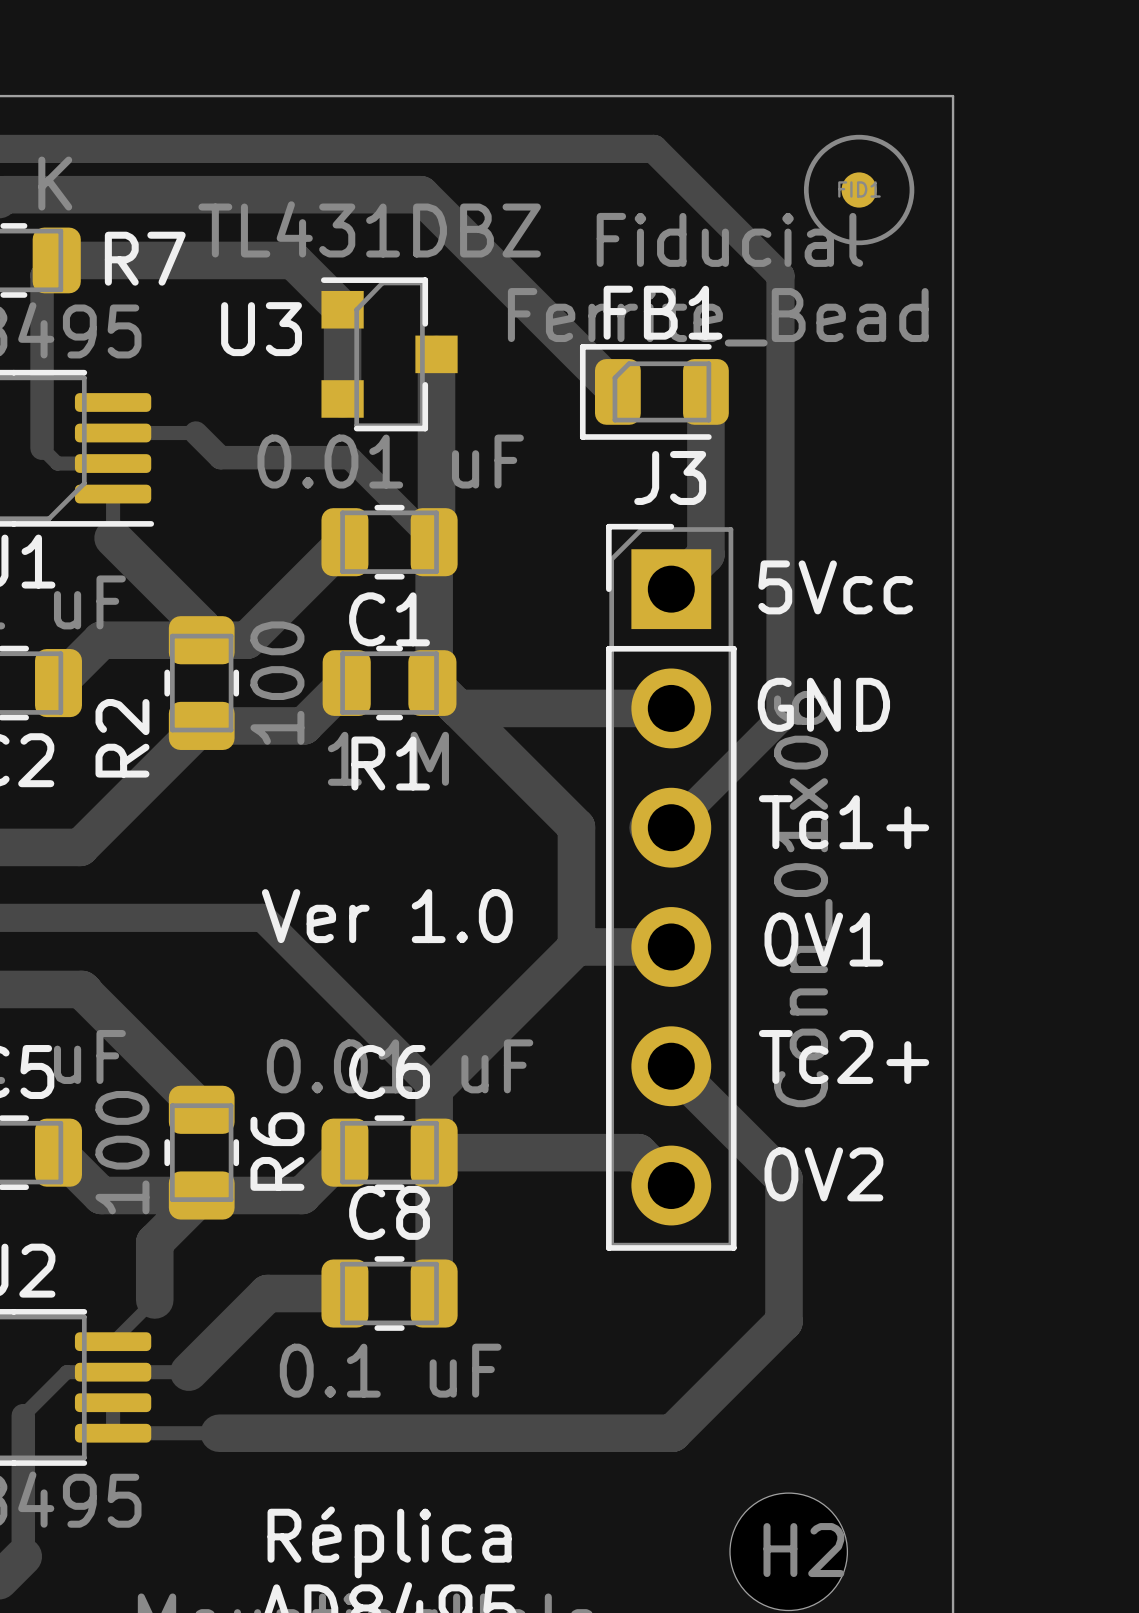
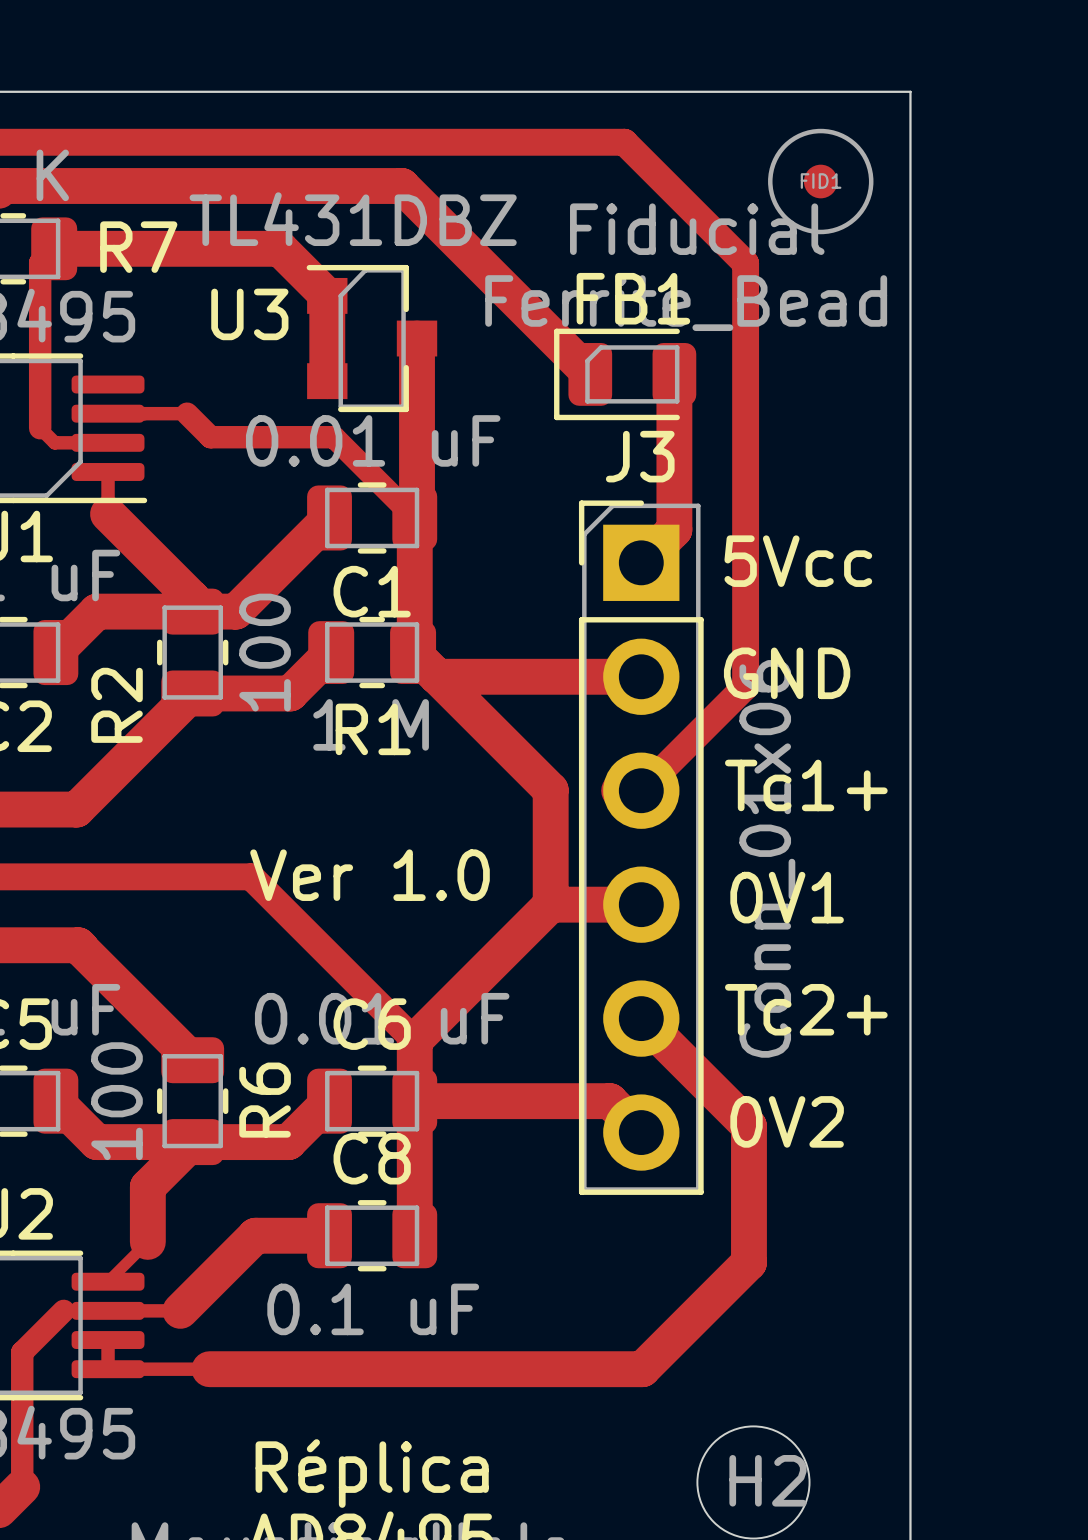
track width: thin (66, 1372) (23, 1415) -> thick (63, 1310) (22, 1352)

